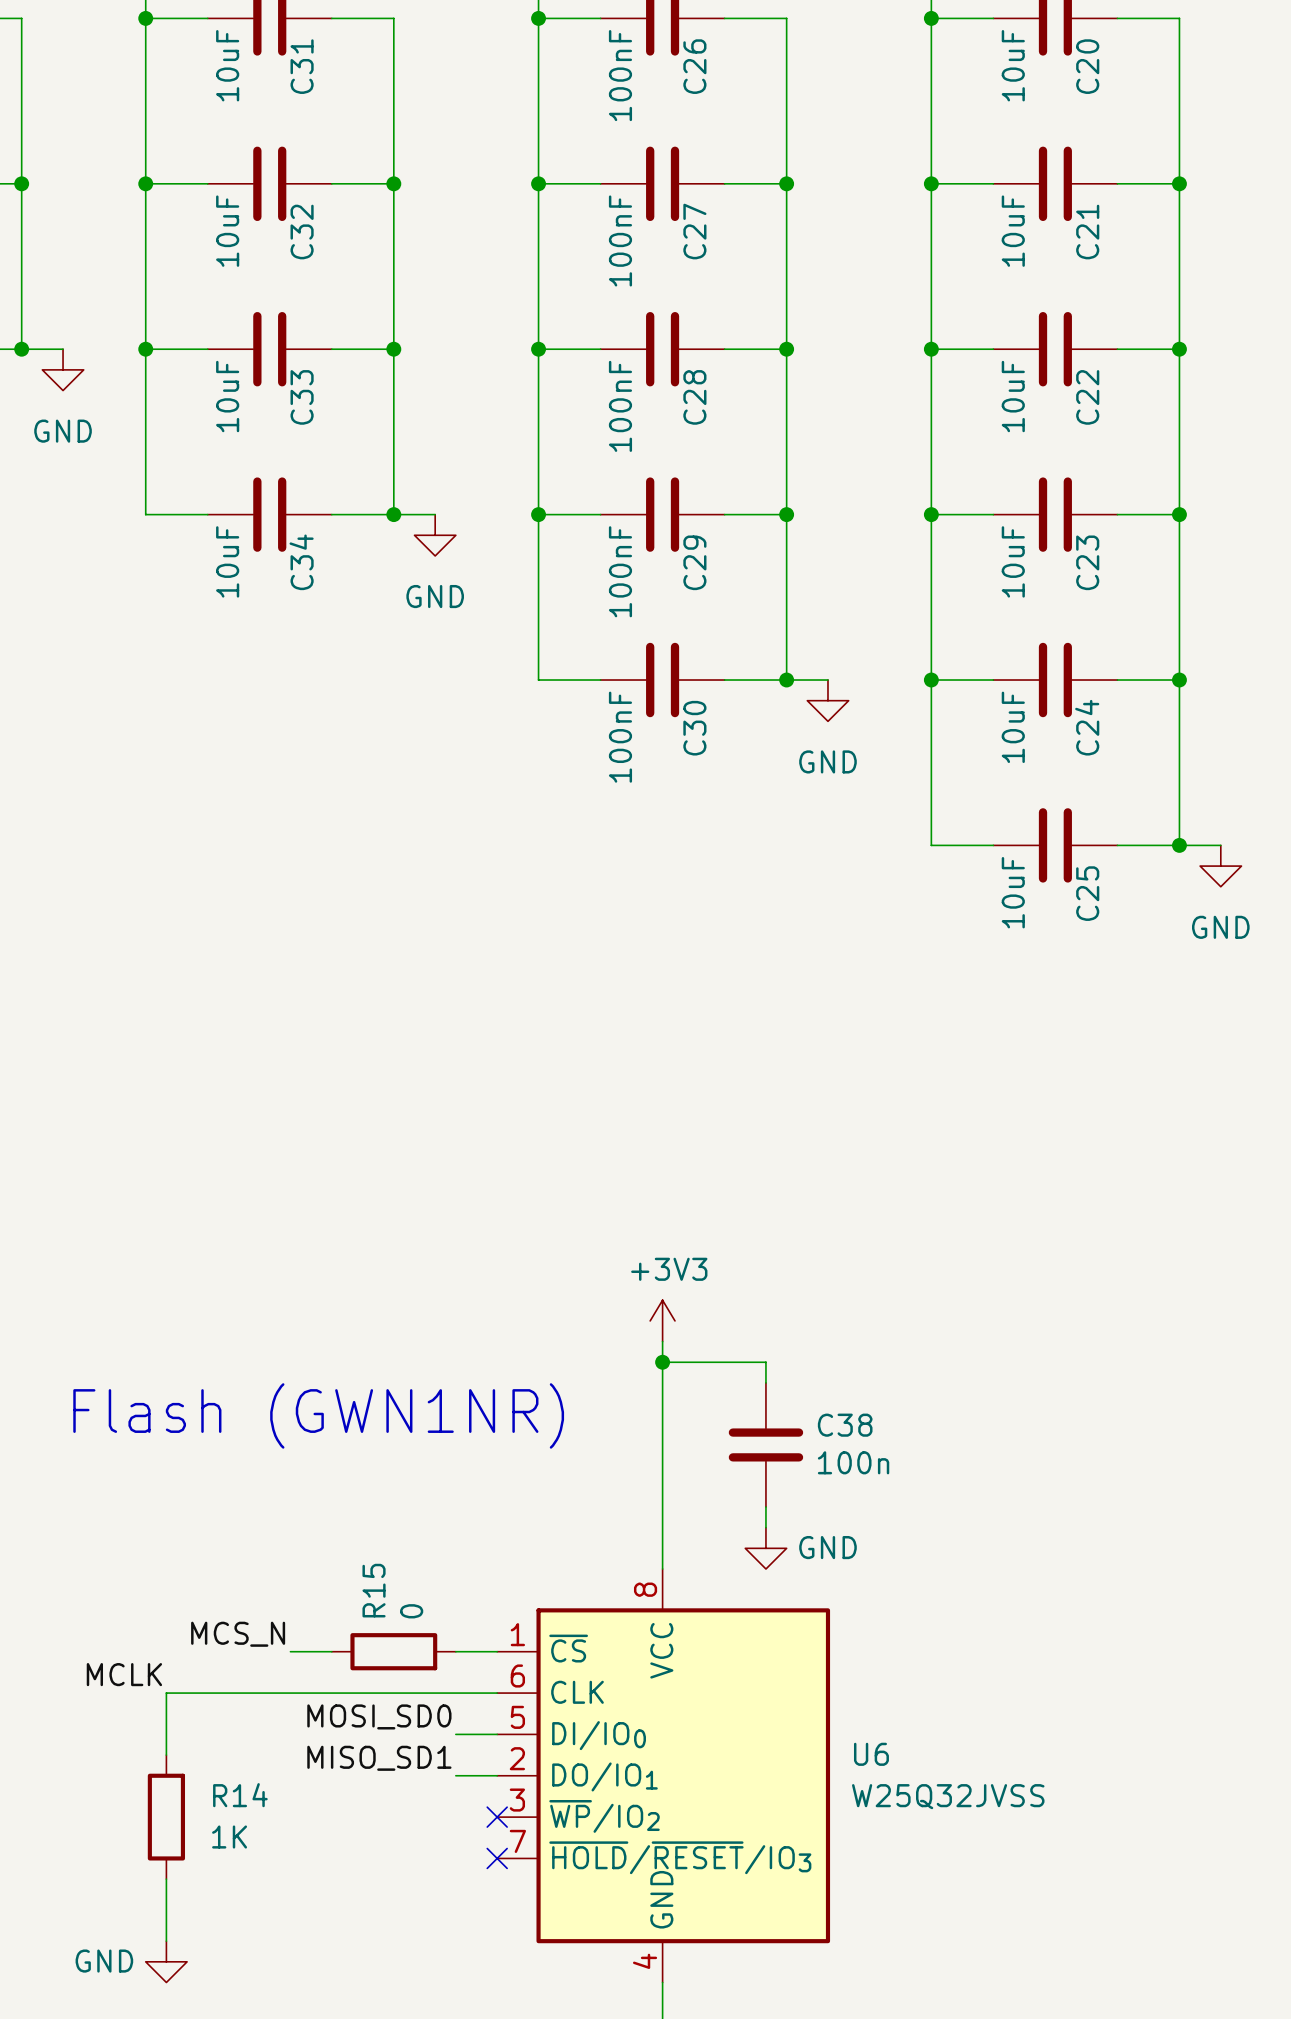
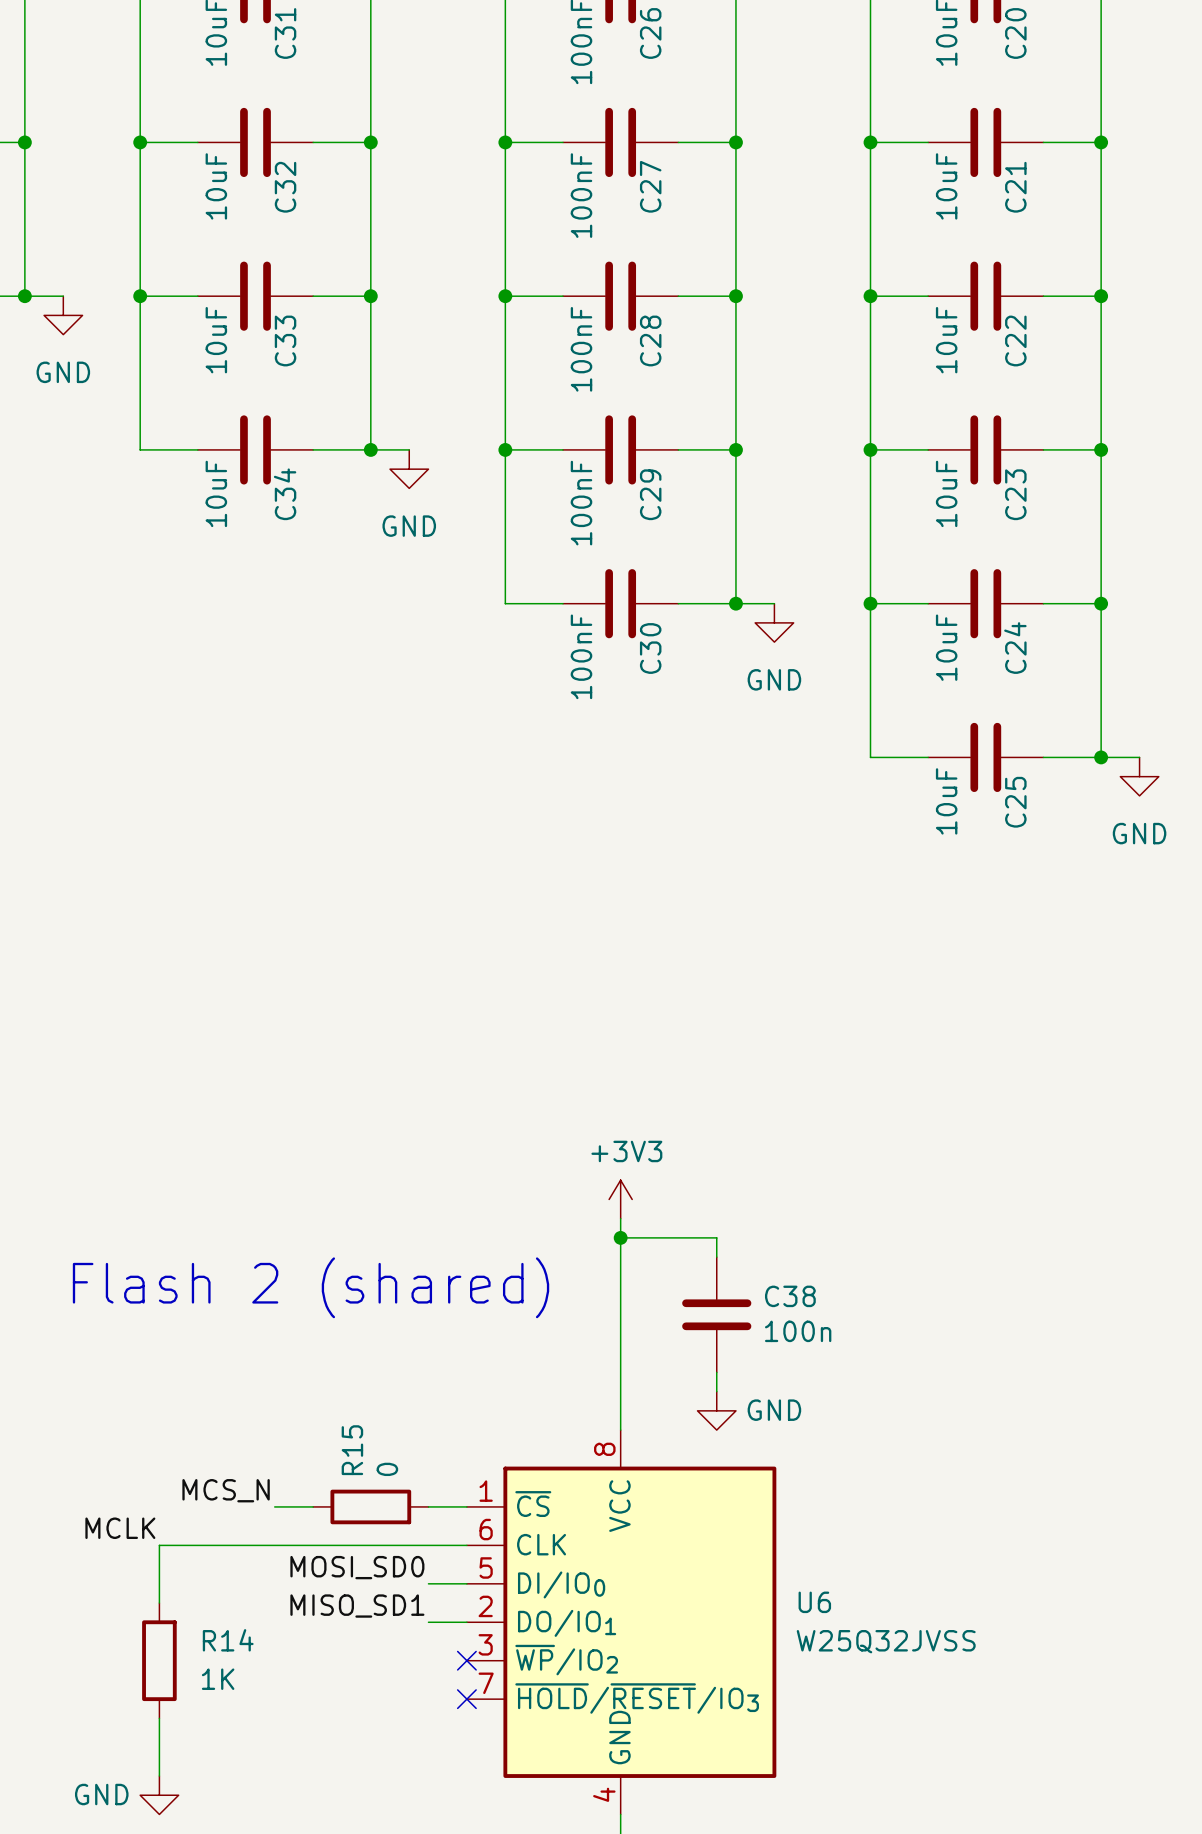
text: Flash (GWN1NR) (318, 1415) -> Flash 2 (shared) (311, 1287)

